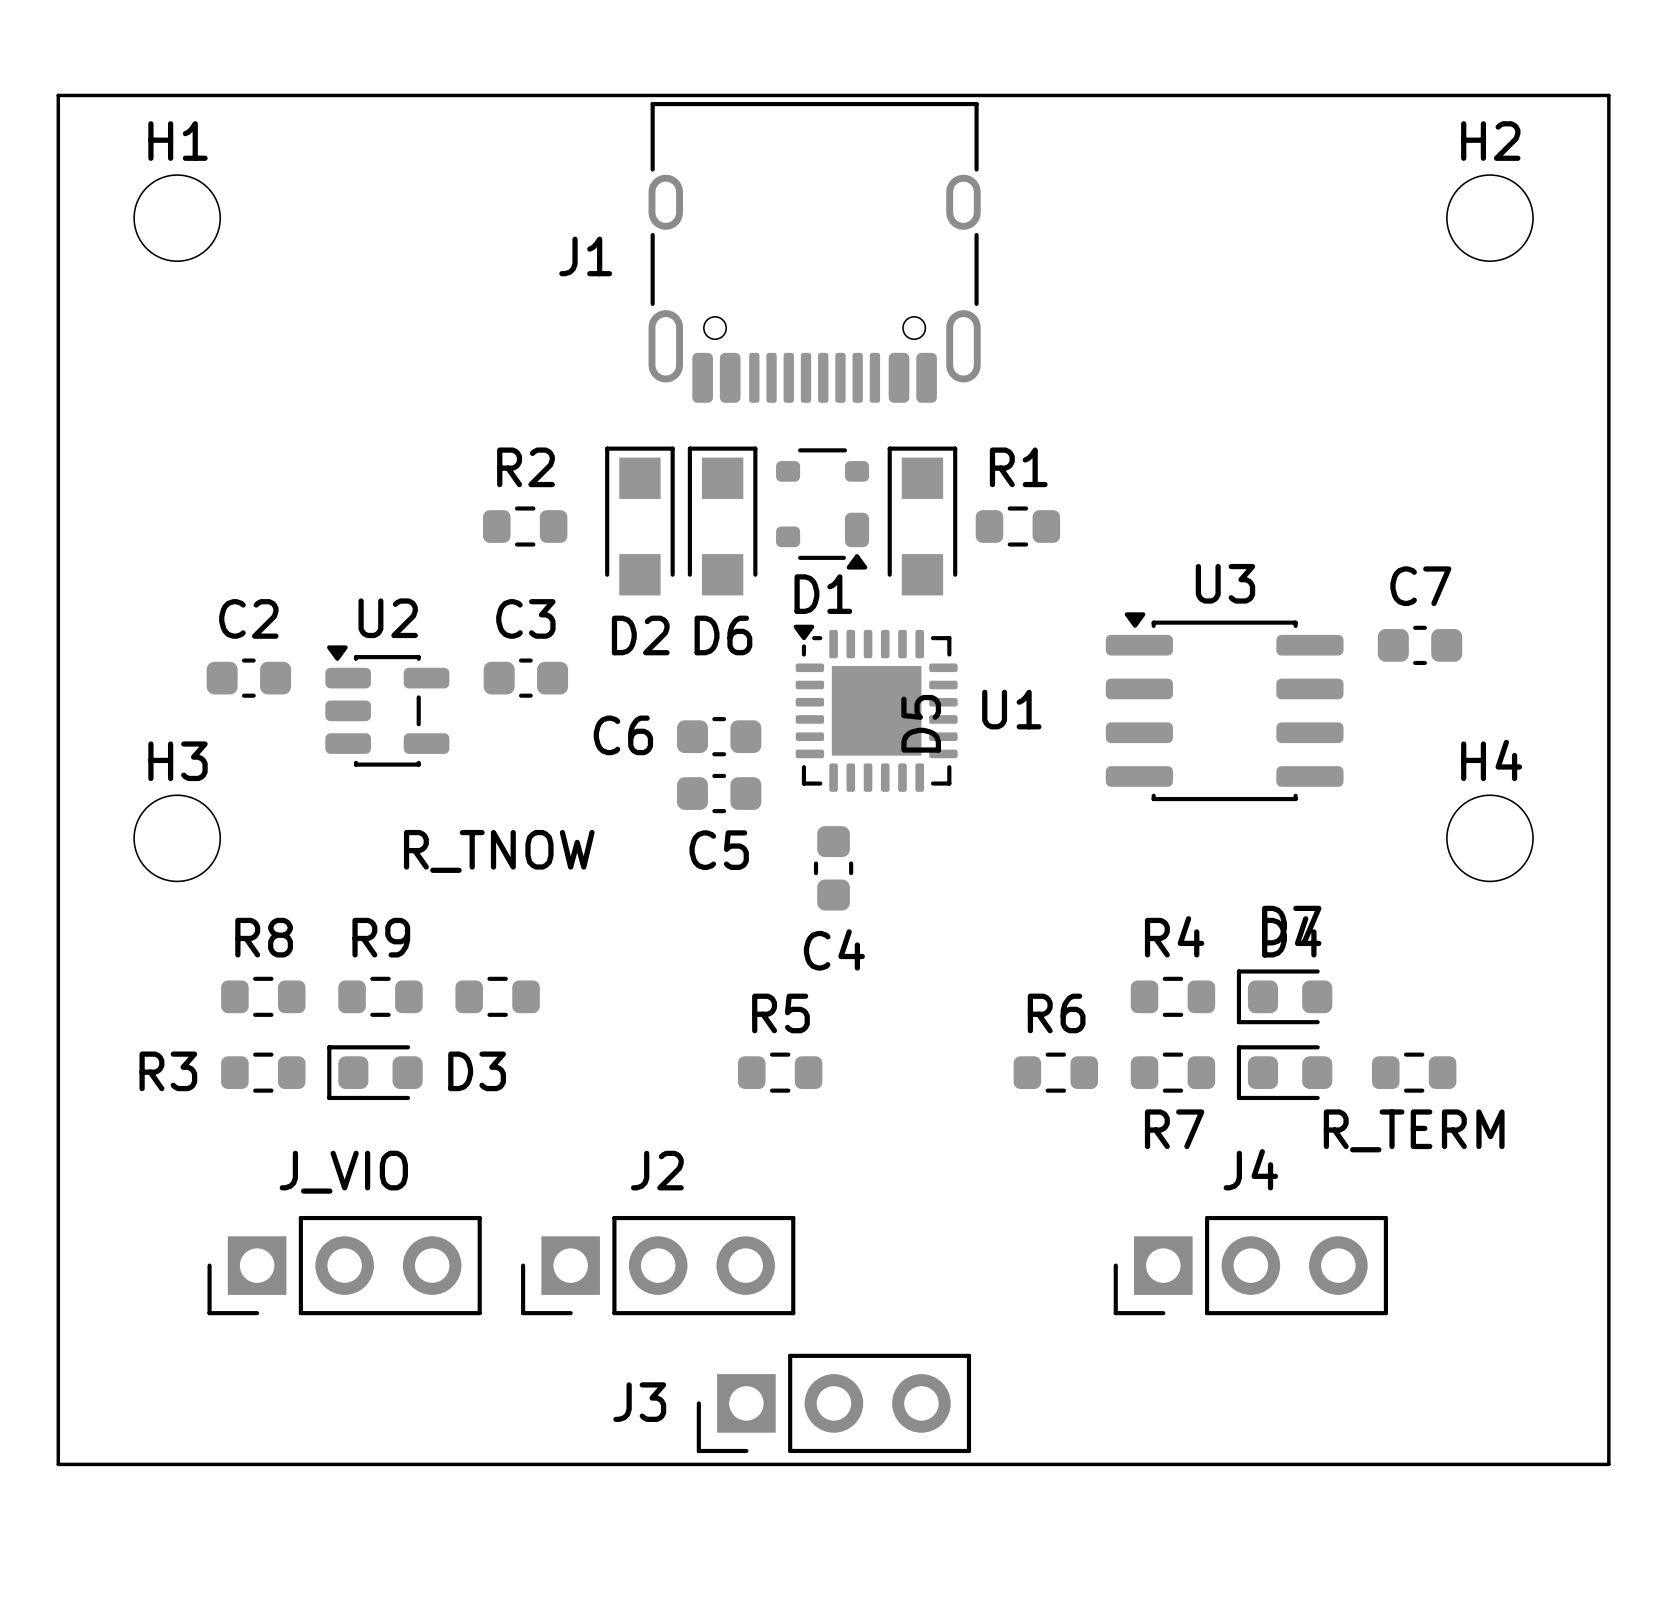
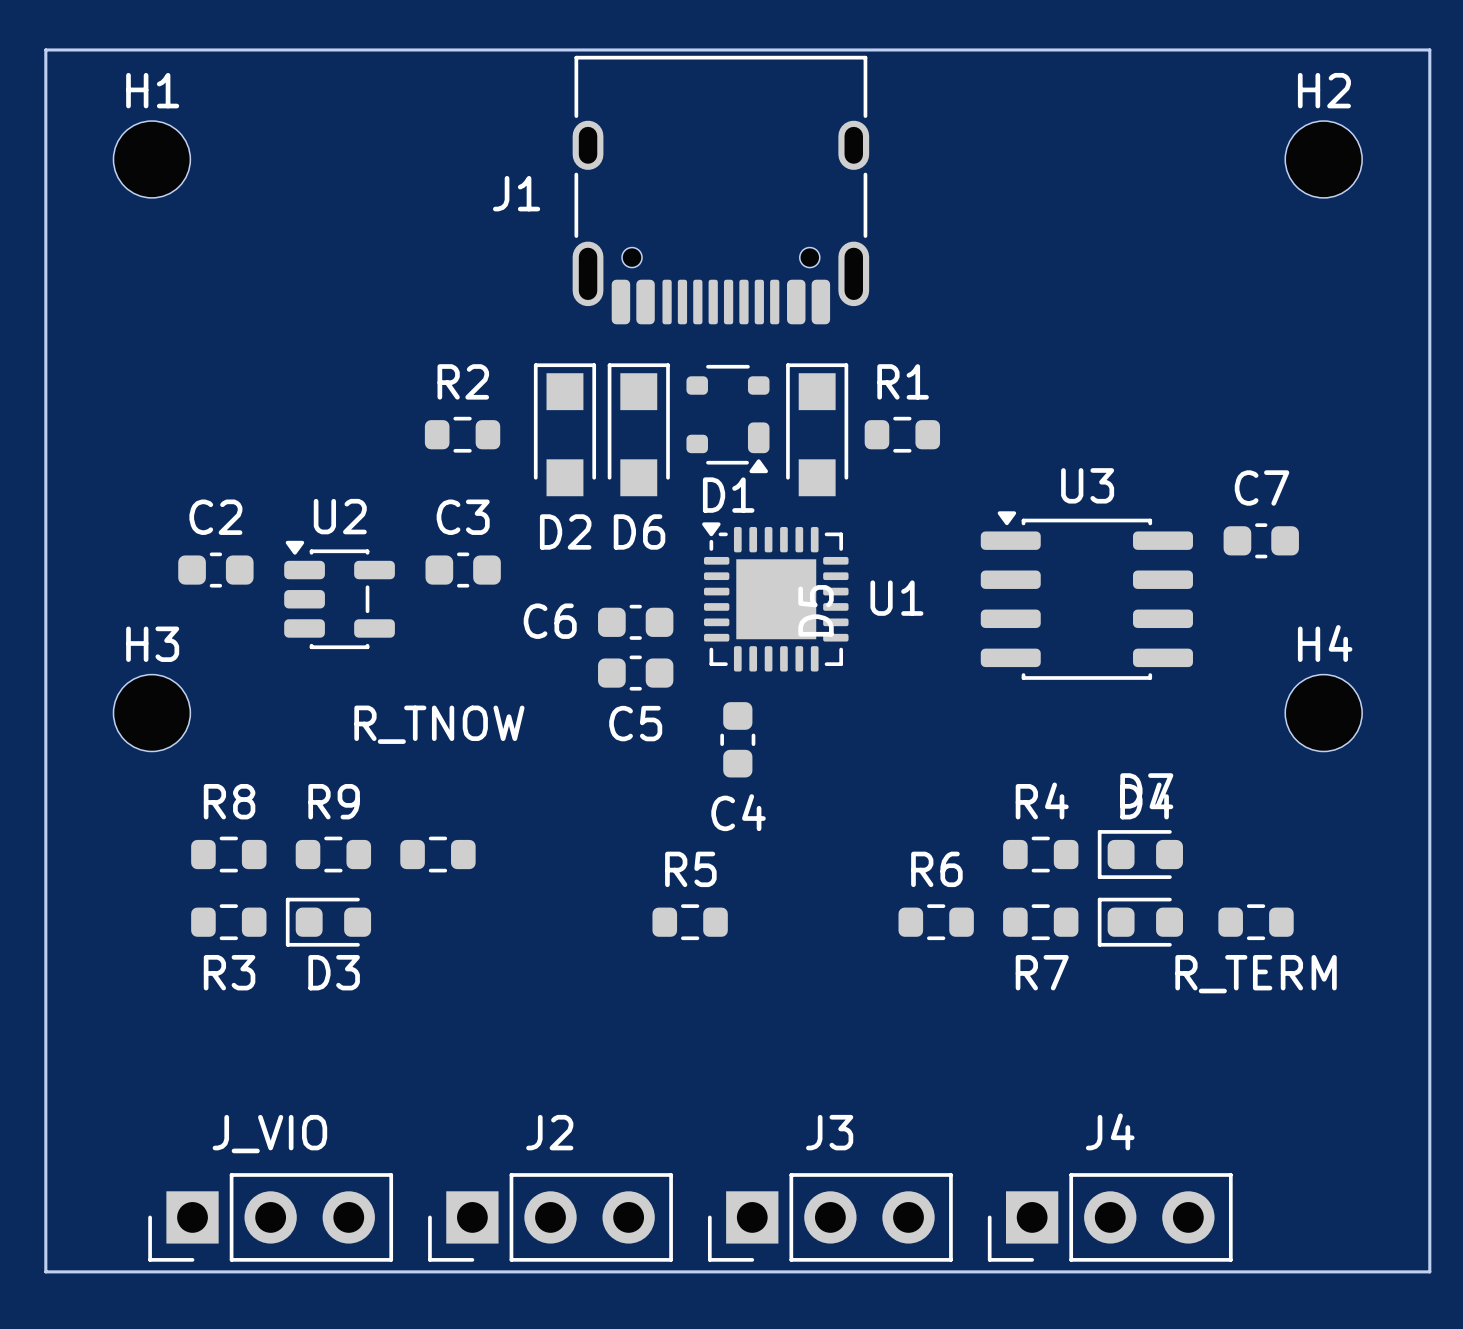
R3 name position: R3 (168, 1071) -> R3 (229, 972)
D3 name position: D3 (477, 1071) -> D3 (334, 972)
J_VIO position: (344, 1265) -> (270, 1217)
J2 position: (658, 1265) -> (550, 1217)
J4 position: (1250, 1265) -> (1110, 1217)
J3 name position: J3 (639, 1402) -> J3 (829, 1132)
J3 position: (833, 1403) -> (830, 1217)

